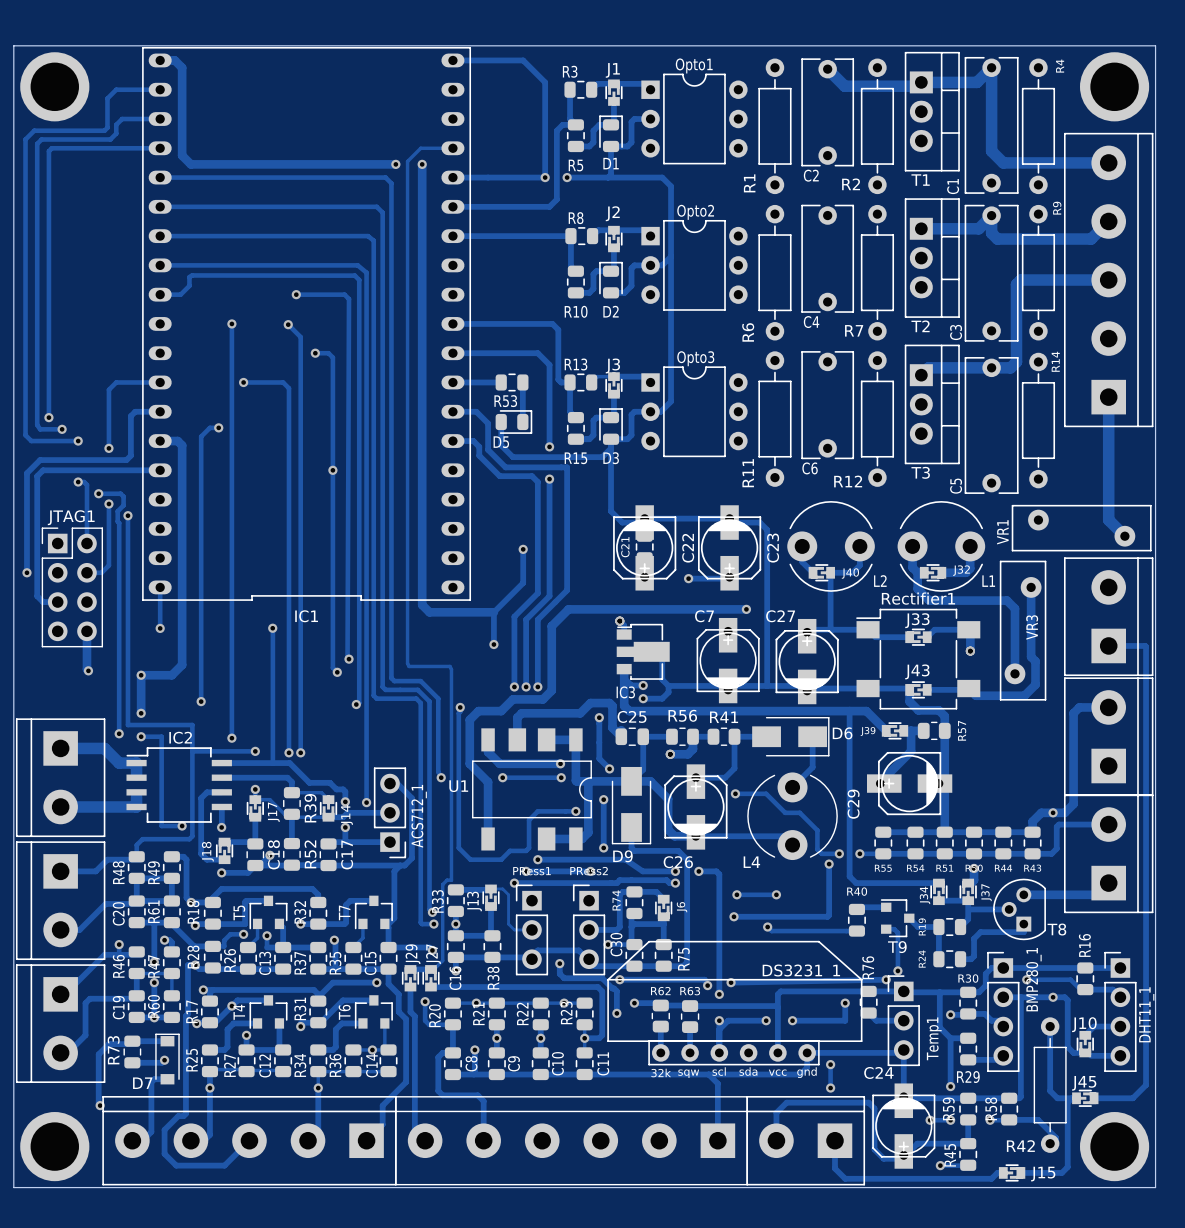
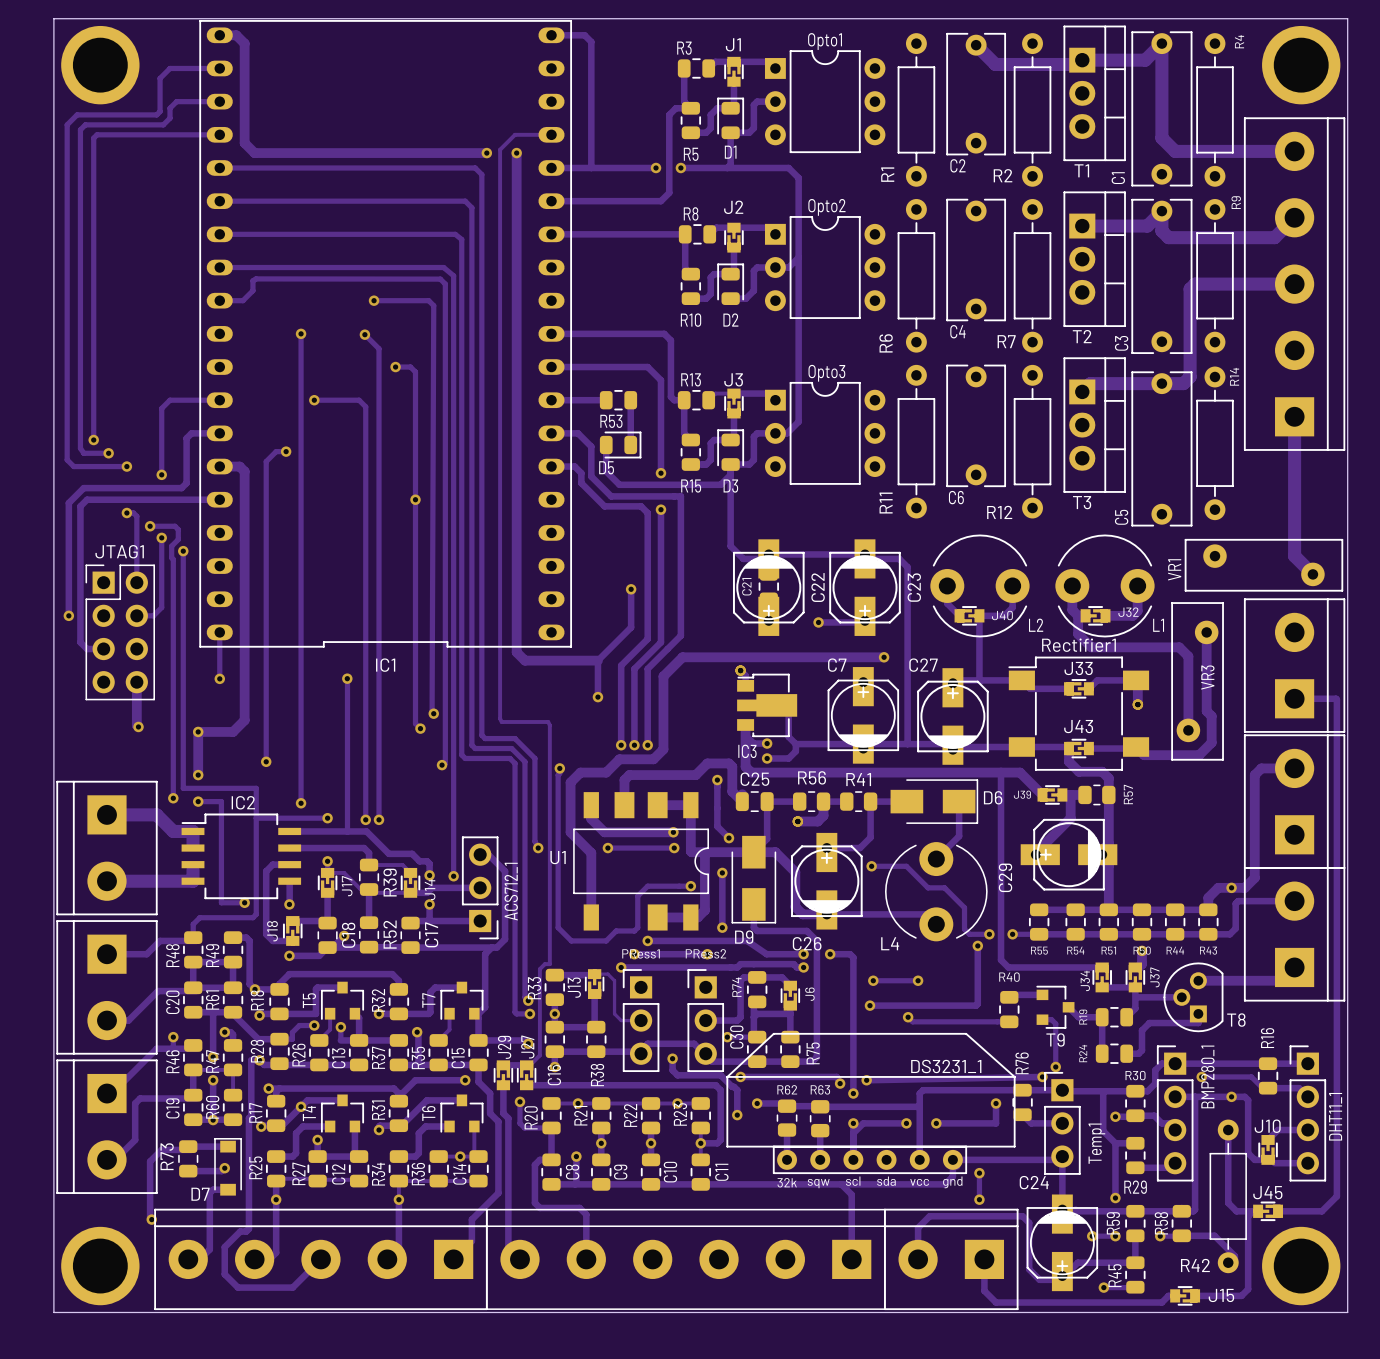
track: (482, 60) (523, 60) (545, 82) (545, 177) -> (584, 35) (591, 41) (591, 167)

